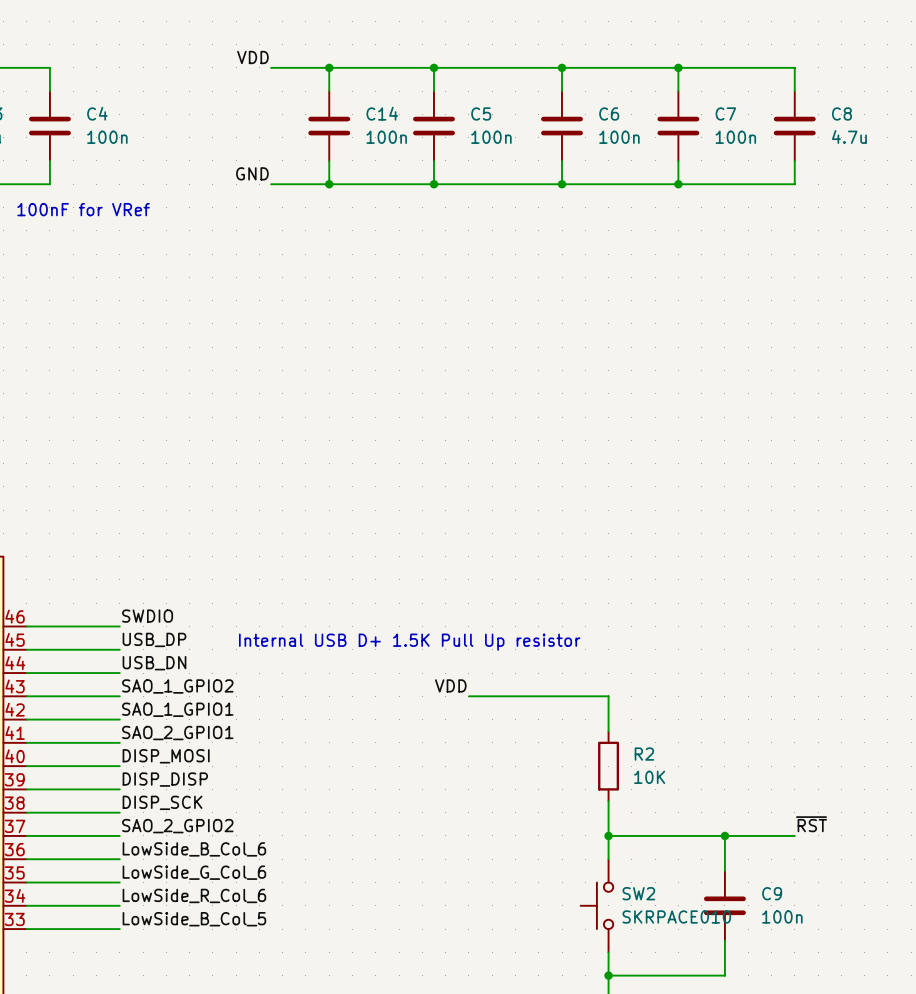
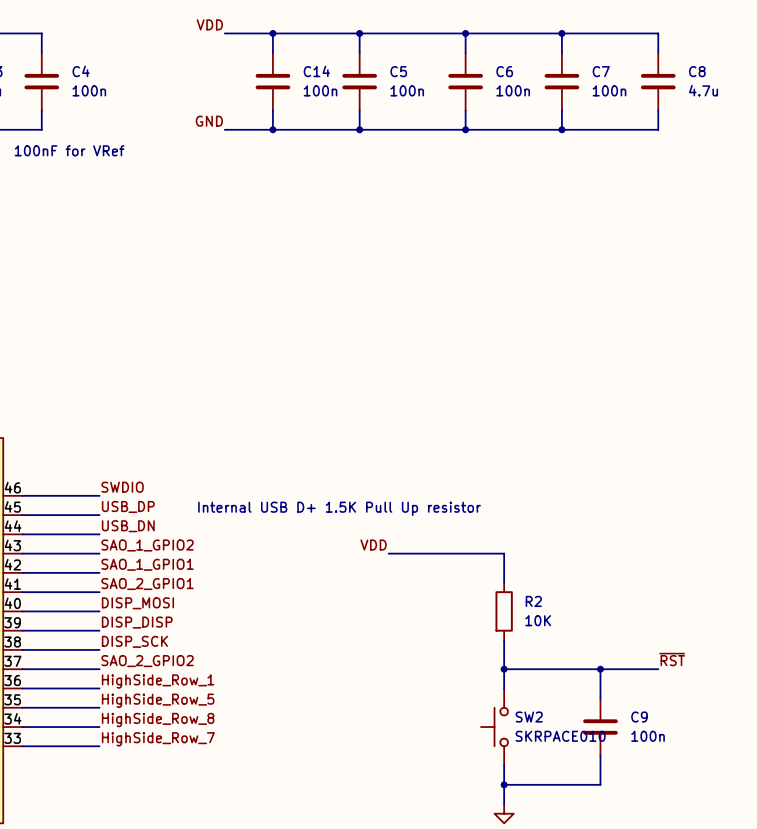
label: LowSide_B_Col_6 (194, 849) -> HighSide_Row_1 (158, 681)
label: LowSide_G_Col_6 (194, 872) -> HighSide_Row_5 (158, 700)
label: LowSide_R_Col_6 (194, 895) -> HighSide_Row_8 (158, 720)
label: LowSide_B_Col_5 (194, 919) -> HighSide_Row_7 (158, 739)

